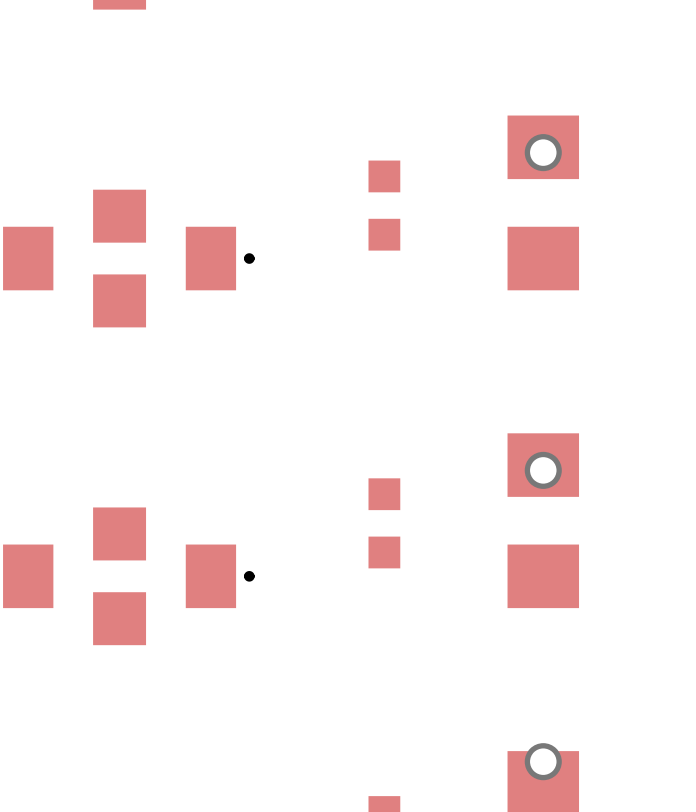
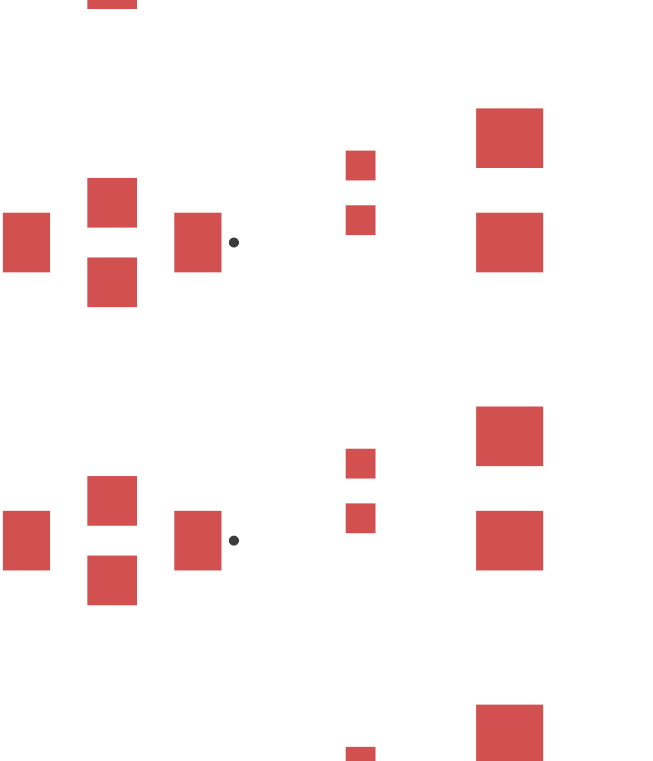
via: (543, 152) -> none
via: (543, 470) -> none
via: (543, 761) -> none

